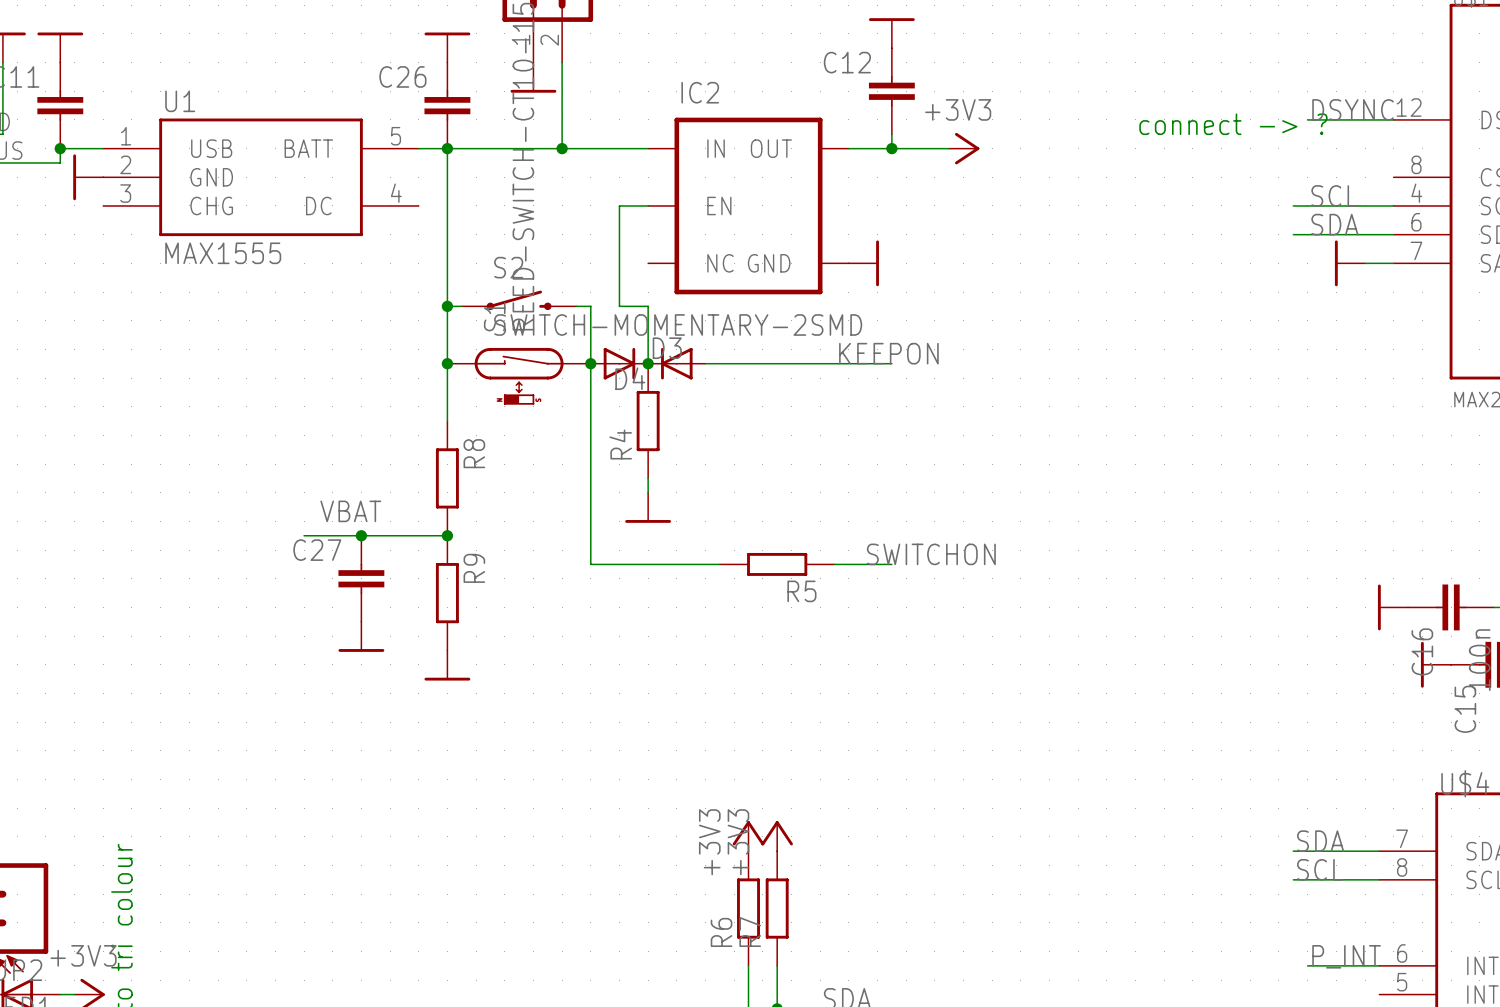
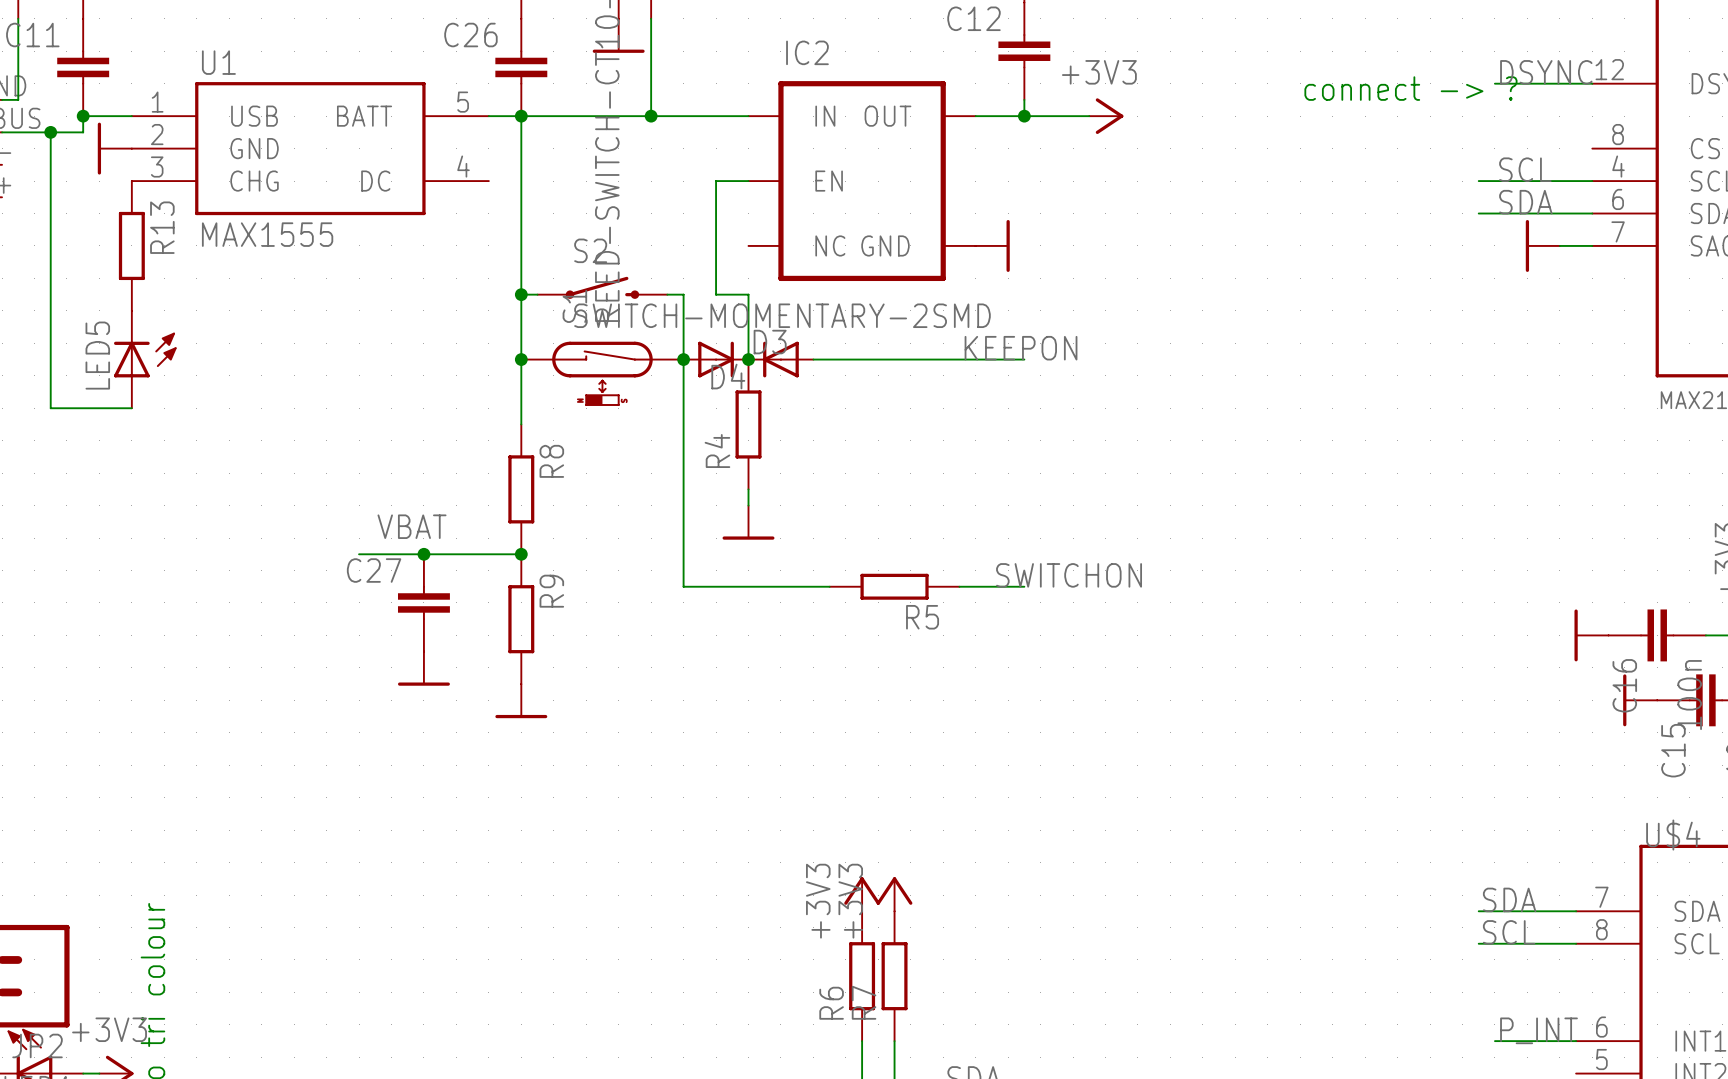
wire: none -> (50, 132) (50, 408) (131, 408)
junction: none -> (50, 132)
R13: none -> (131, 245)
LED5: none -> (145, 359)

